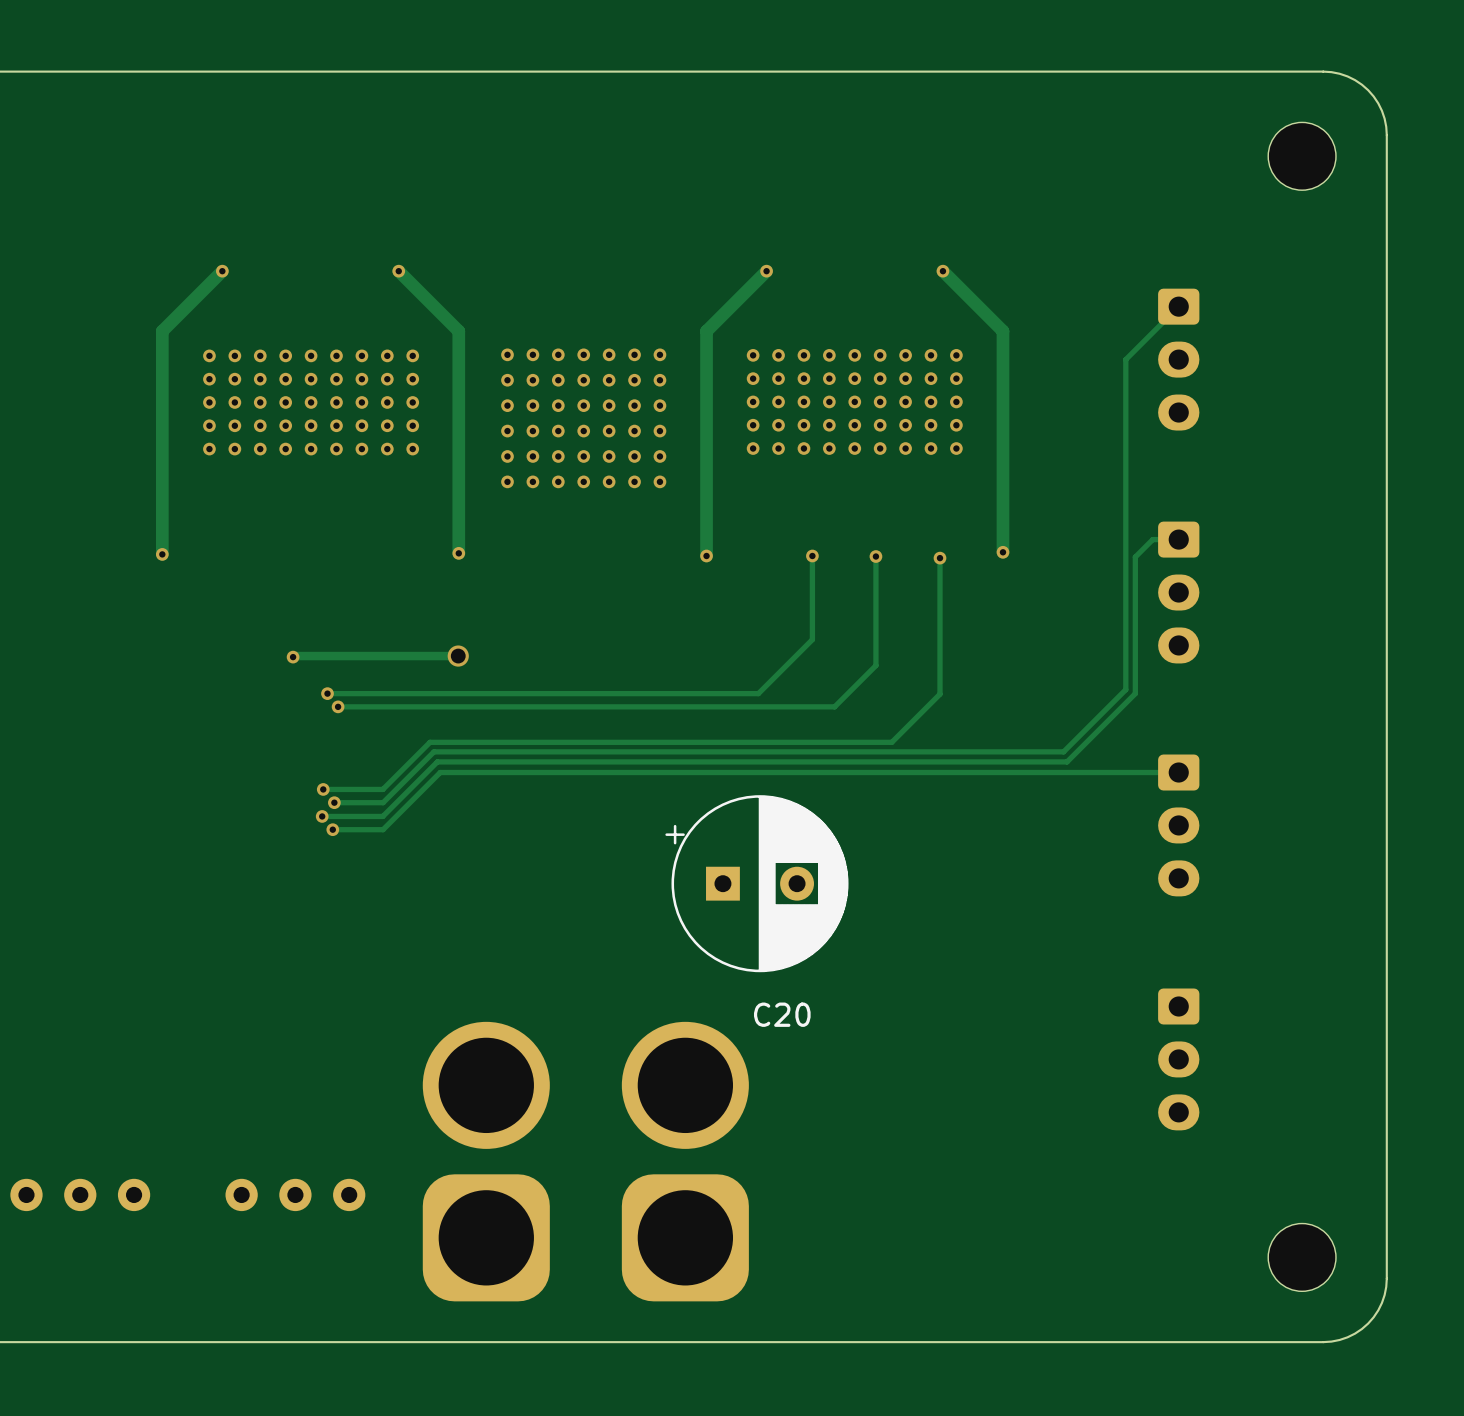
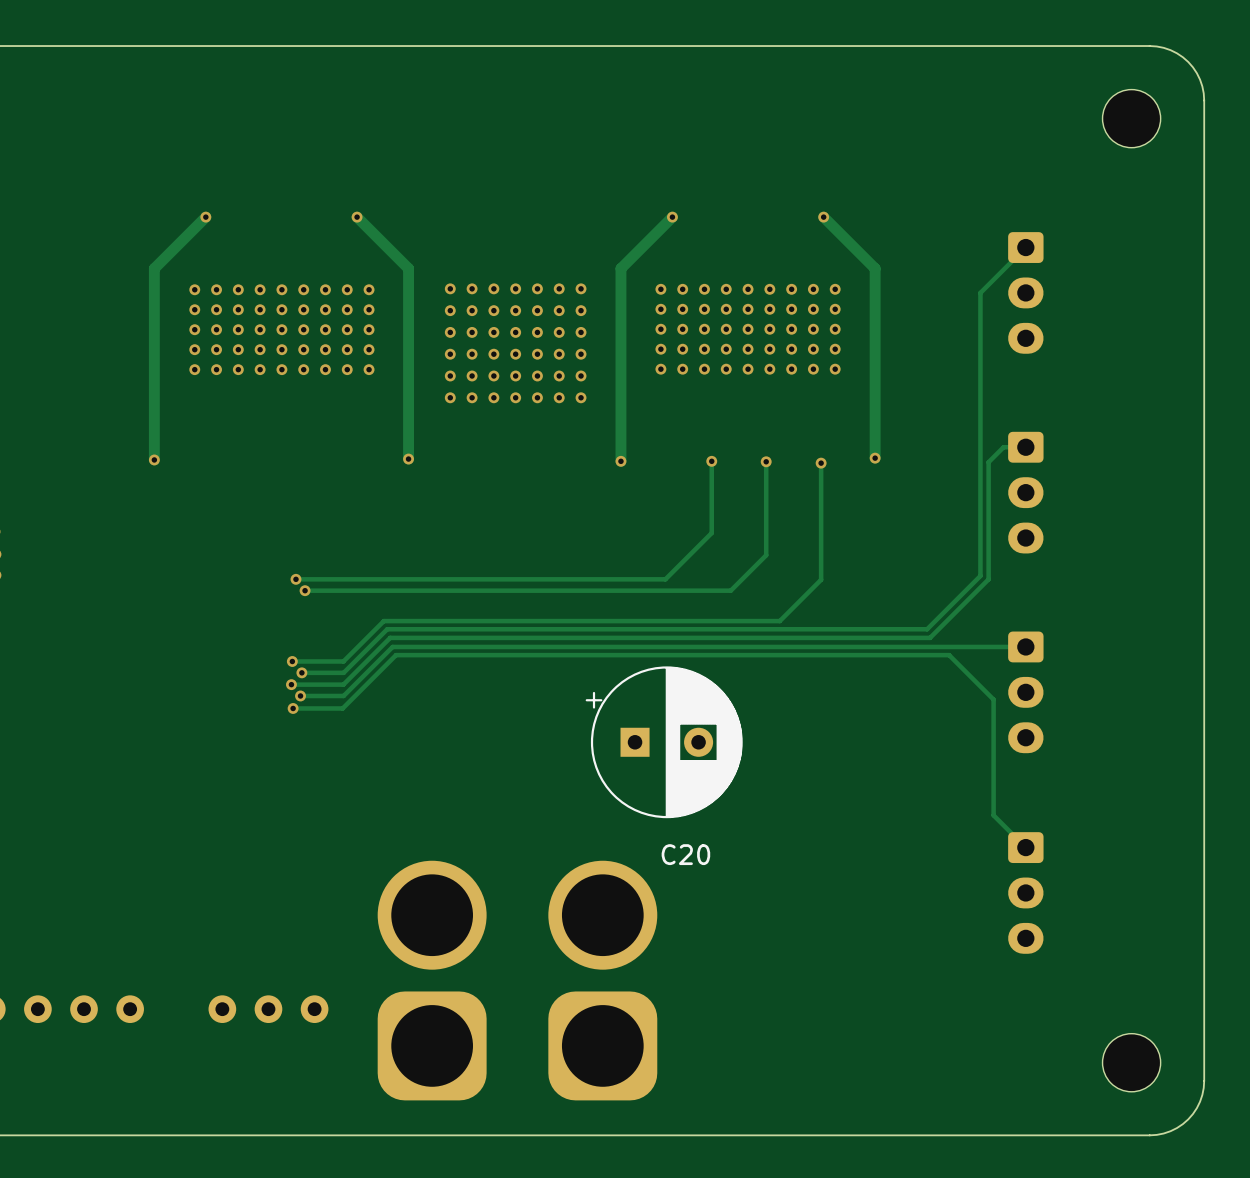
track: (458, 656) (293, 657) -> none
via: (458, 656) -> none
via: (293, 657) -> none
track: none -> (293, 708) (342, 708) (396, 655) (949, 655) (993, 699) (993, 815) (1025, 847)
via: none -> (293, 708)

